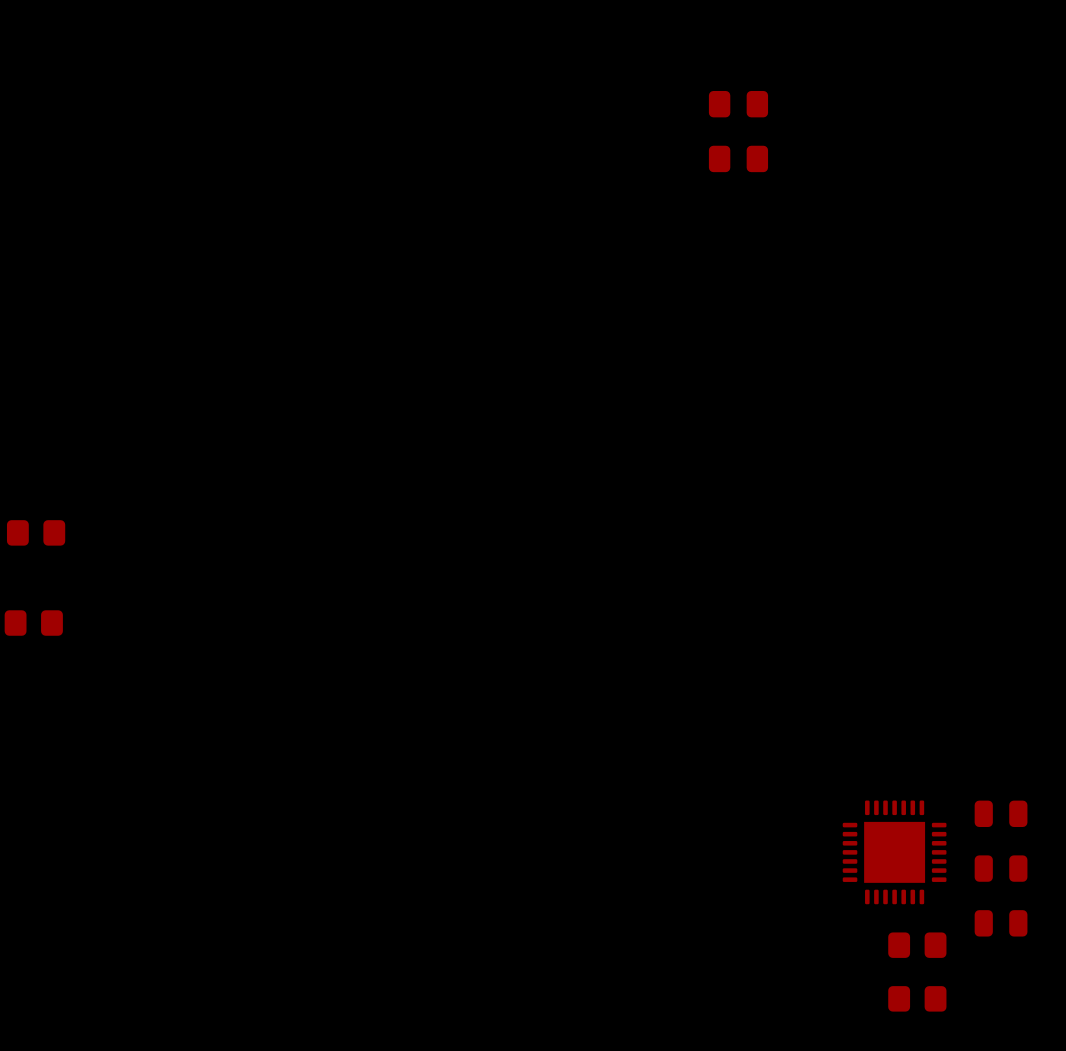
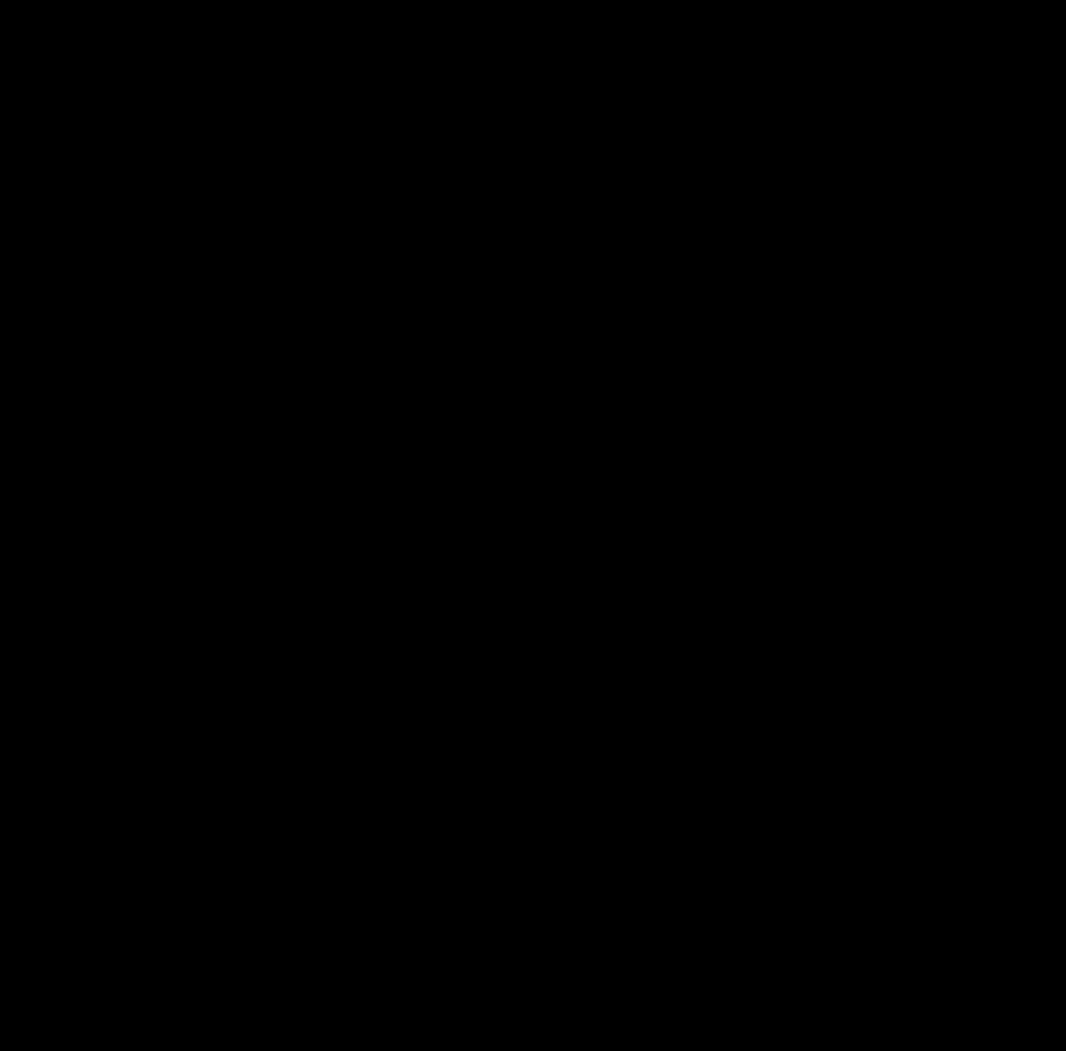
part: (738, 104) -> none
part: (738, 158) -> none
part: (36, 532) -> none
part: (33, 623) -> none
part: (1001, 813) -> none
part: (894, 852) -> none
part: (1001, 868) -> none
part: (1001, 923) -> none
part: (917, 945) -> none
part: (917, 998) -> none

